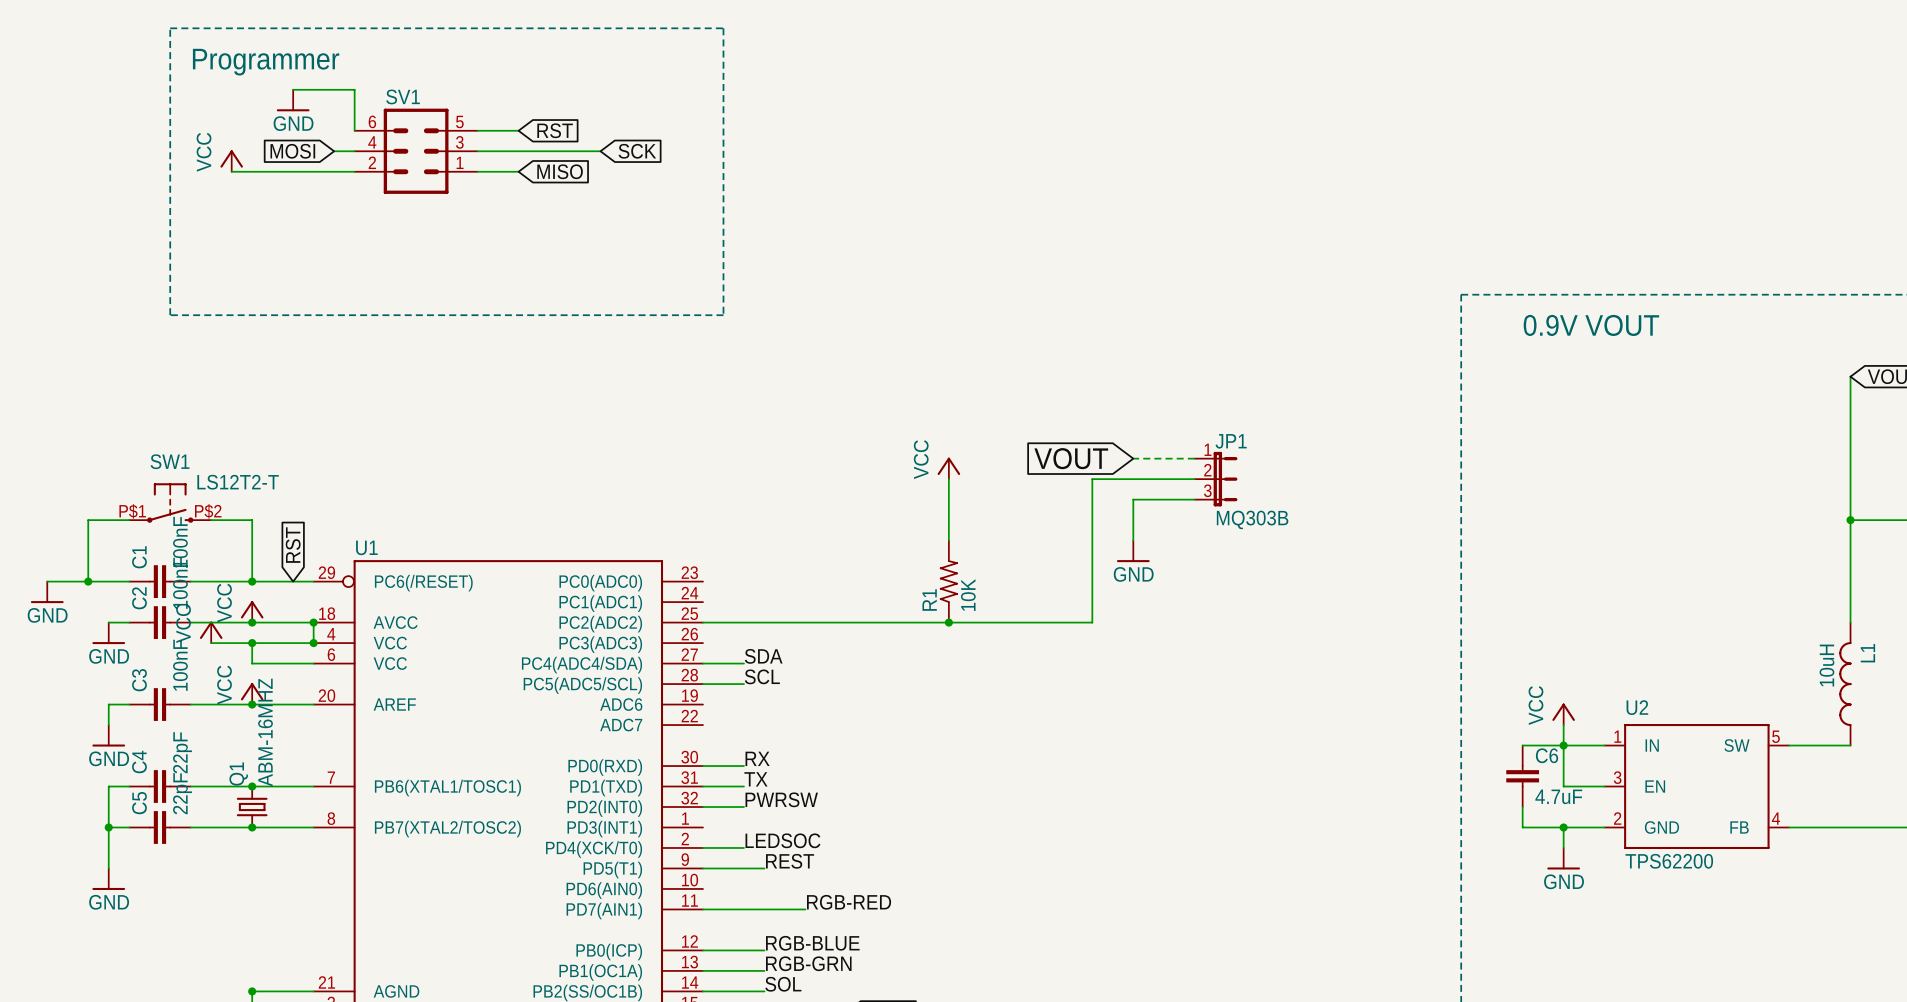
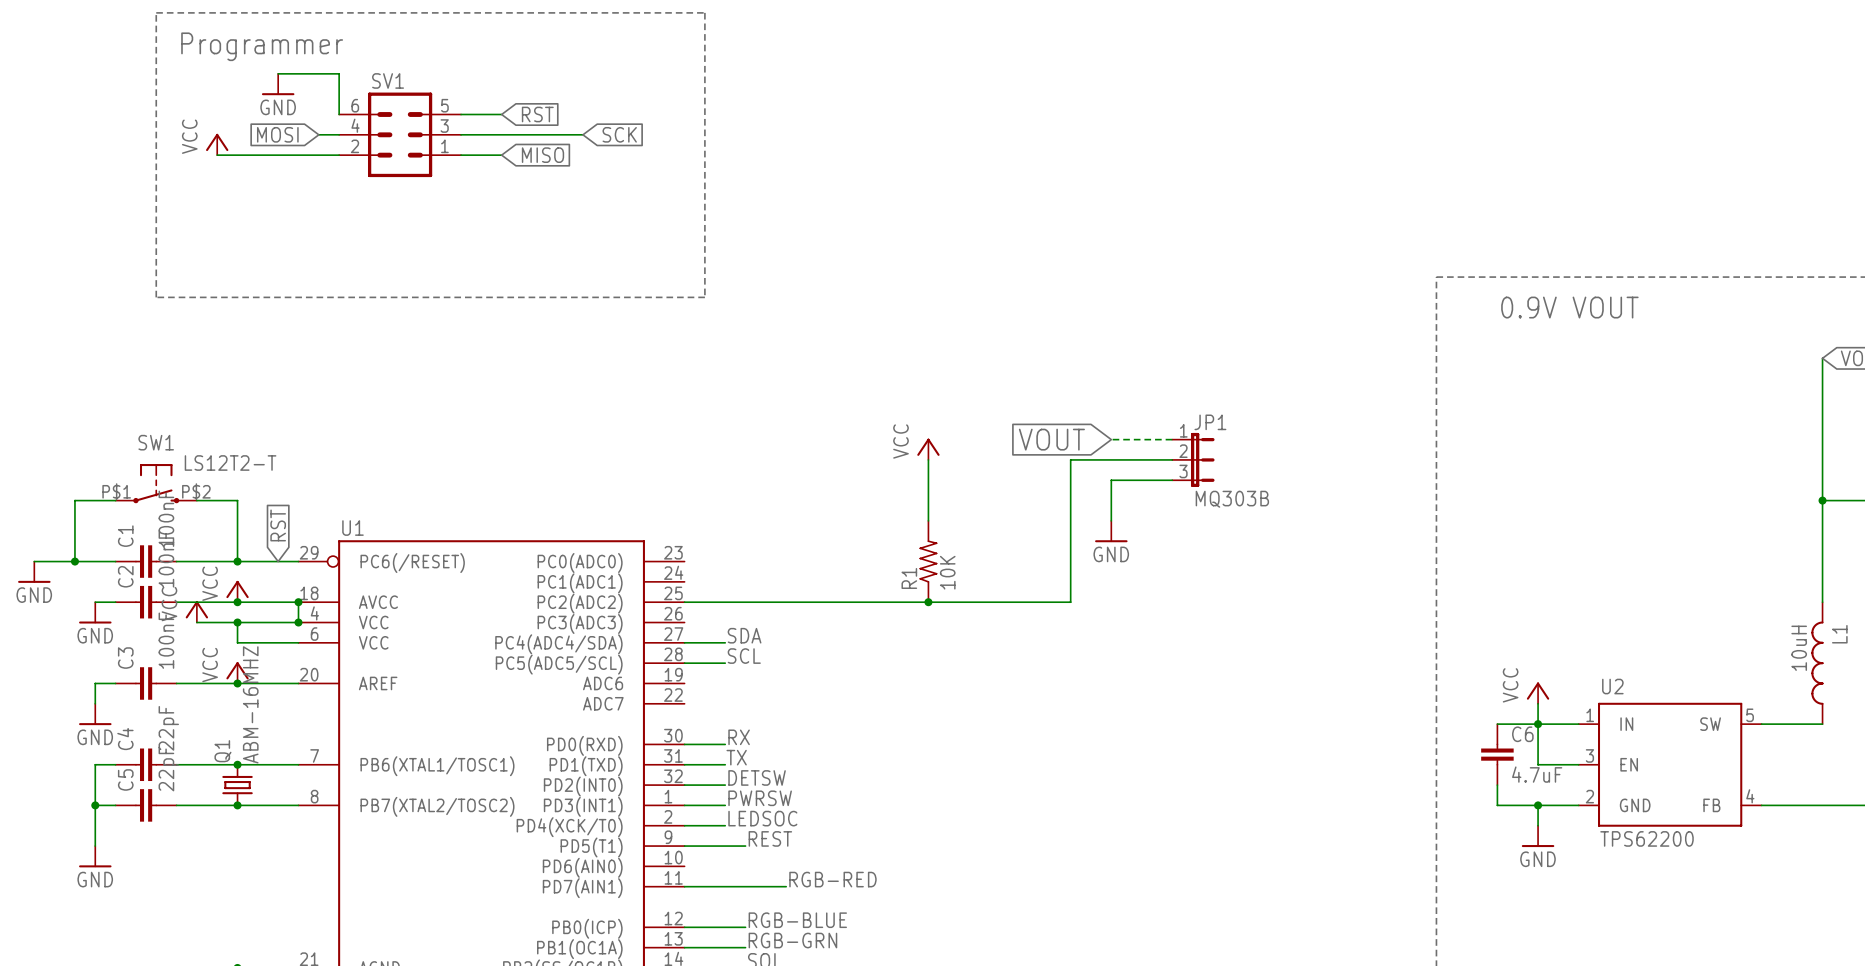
label: PWRSW (781, 799) -> DETSW (757, 777)
label: none -> PWRSW (760, 798)
wire: none -> (684, 805) (725, 805)

